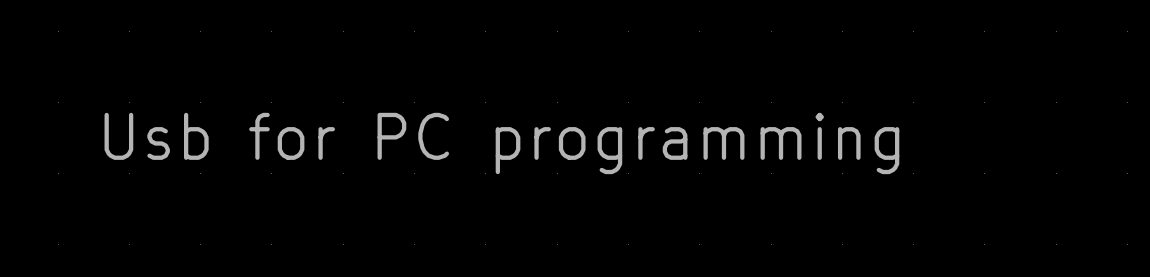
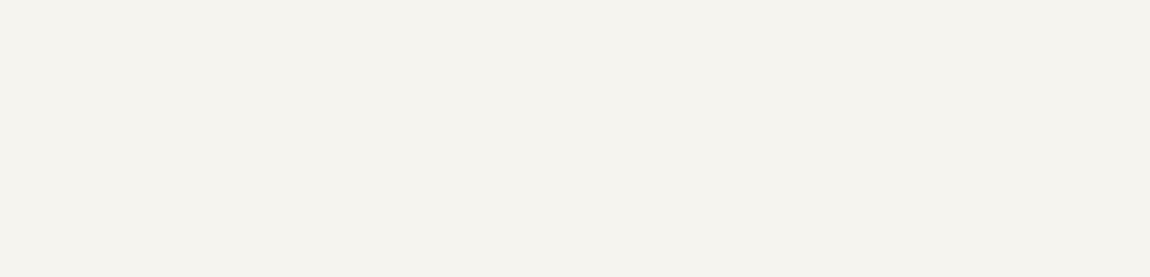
label: Usb for PC programming (501, 143) -> none

